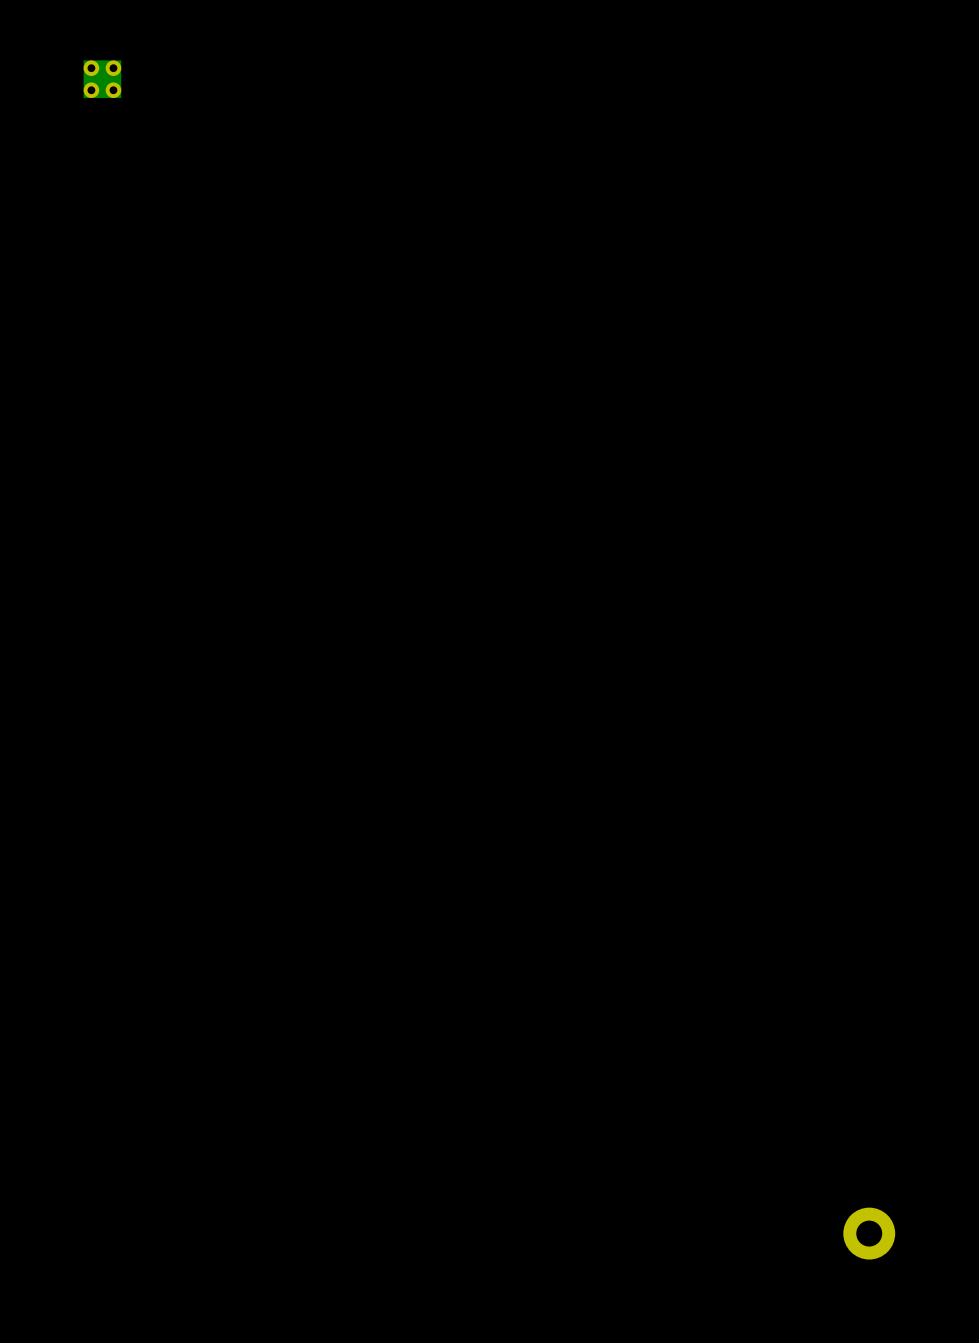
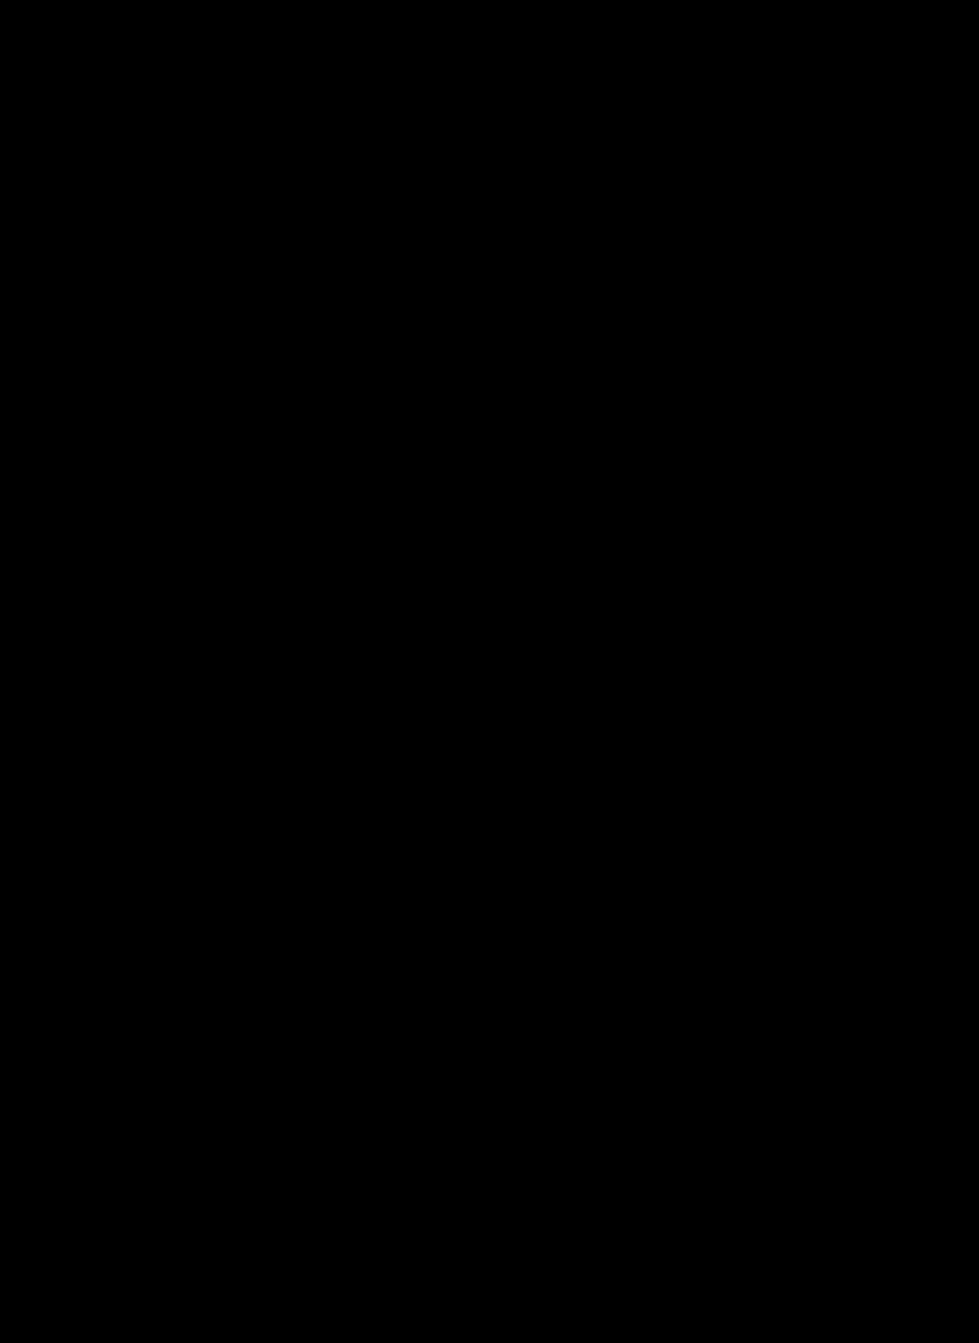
part: (102, 79) -> none
part: (869, 1233) -> none

